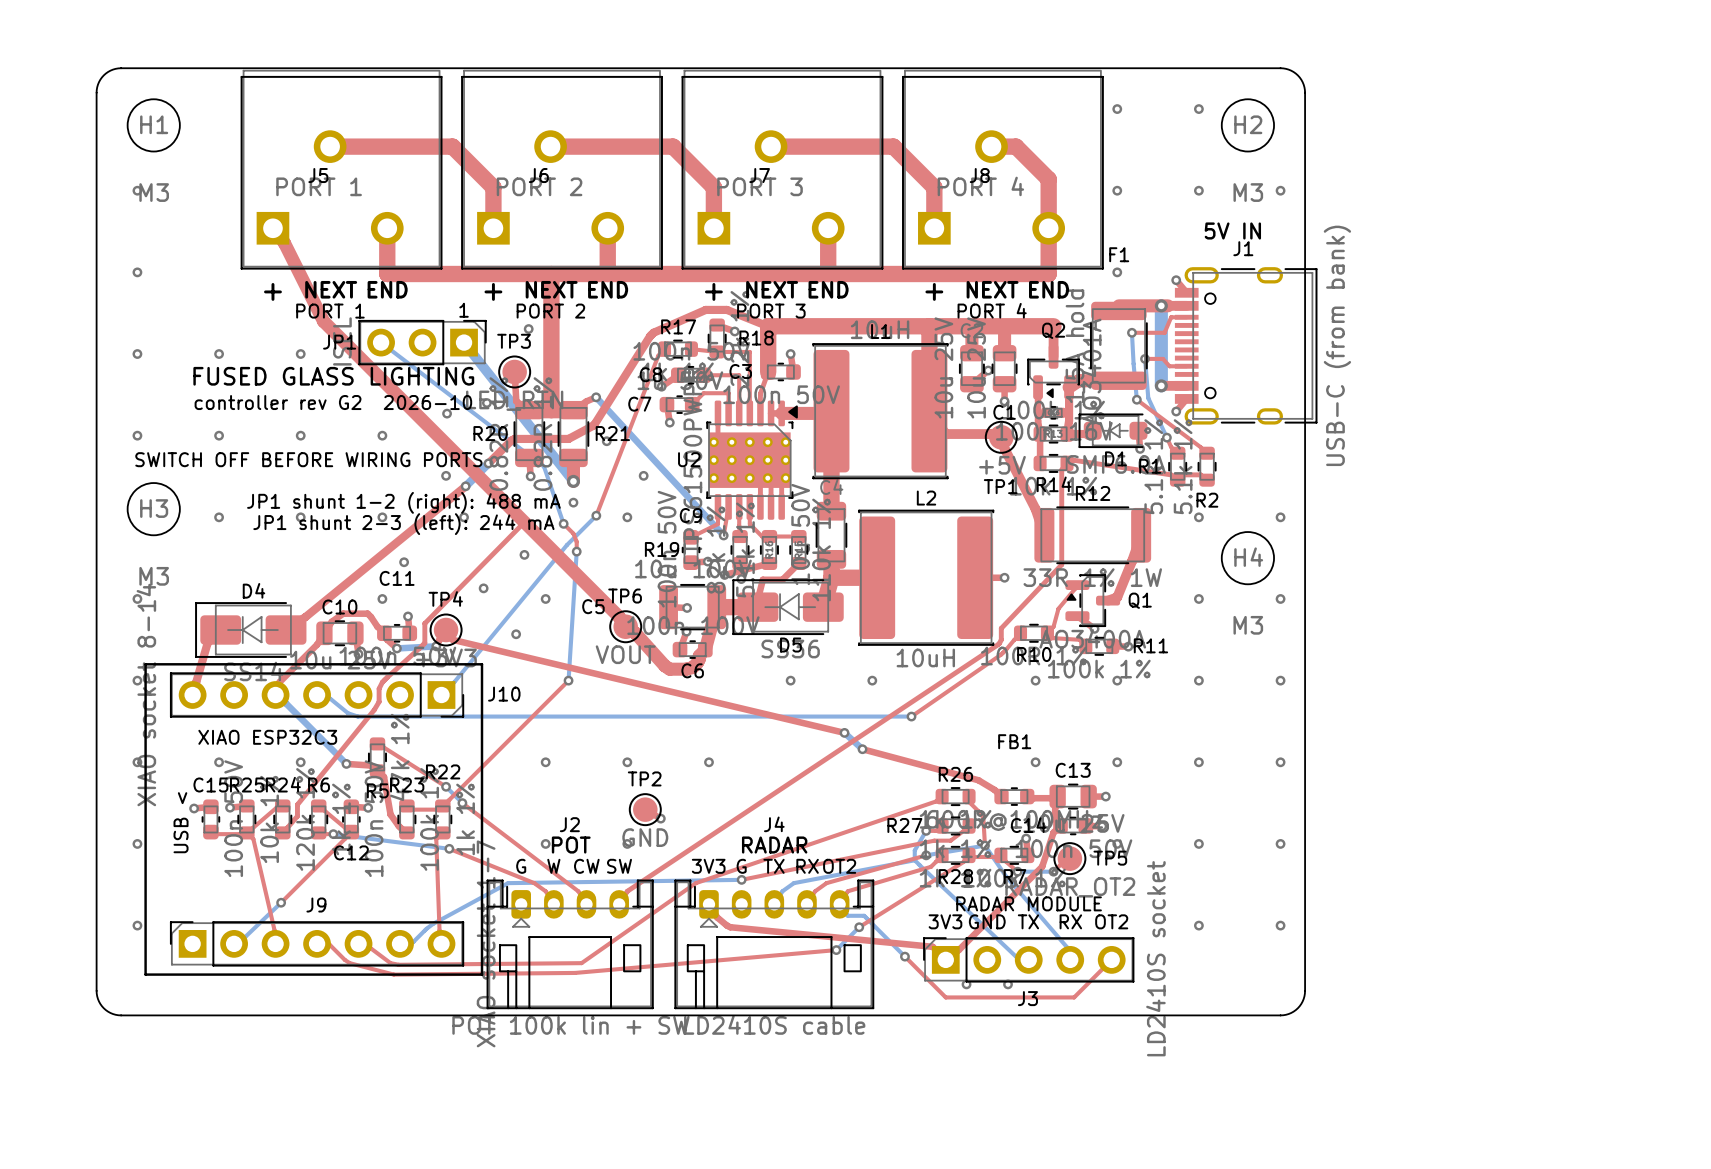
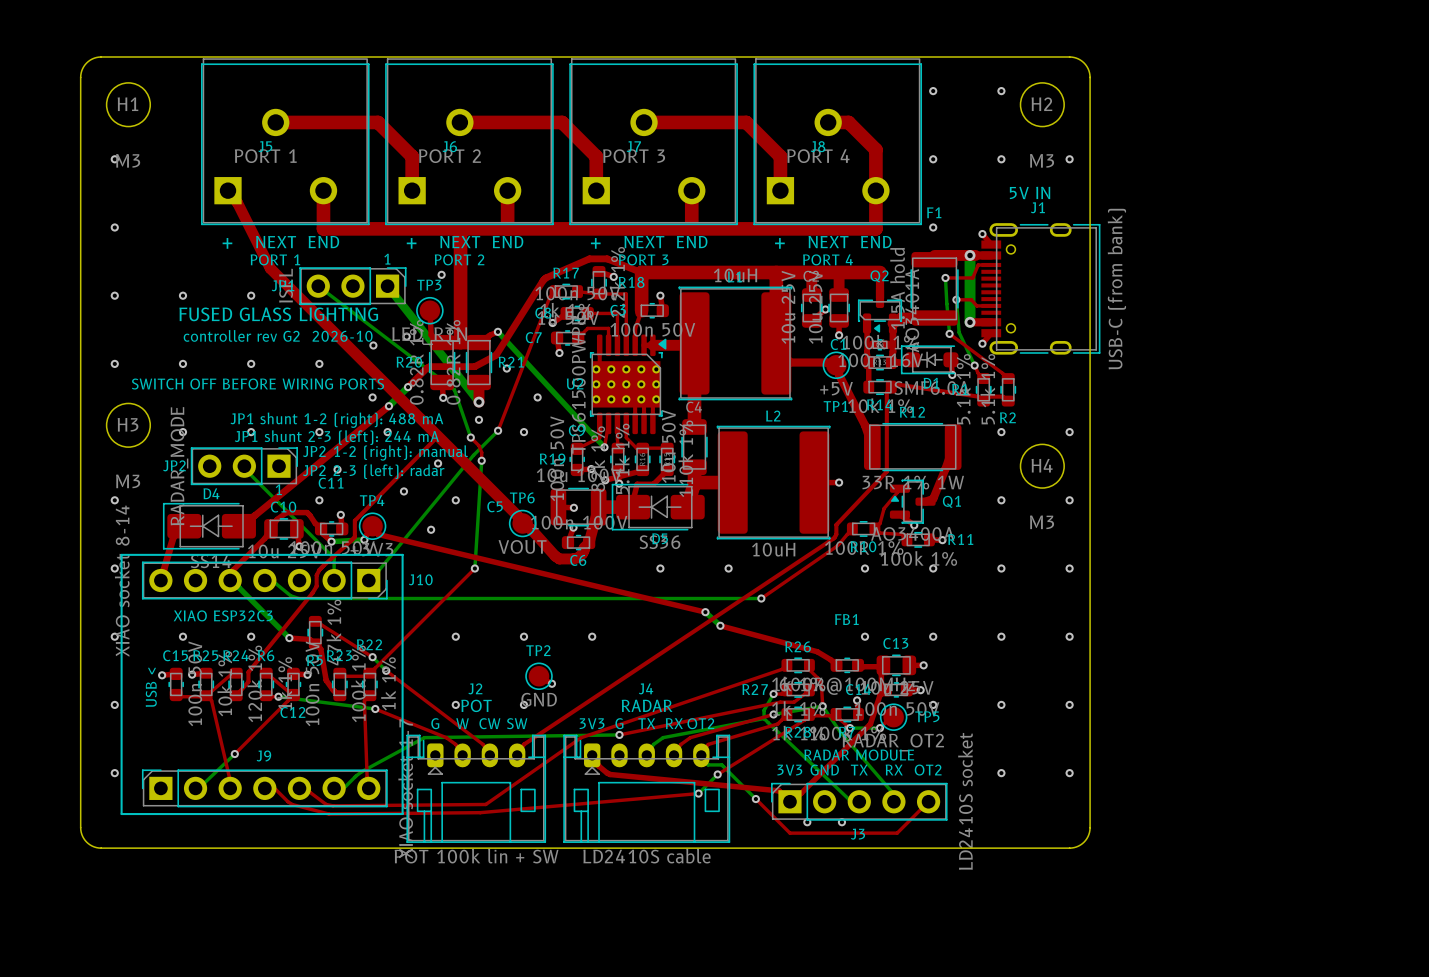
text: none -> JP2 1-2 (right): manual (385, 452)
bottom track: none -> (244, 466) (244, 468) (334, 558) (334, 580)
JP2: none -> RADAR_MODE (244, 466)
text: none -> JP2 2-3 (left): radar (373, 471)
text: none -> 1 (278, 489)

